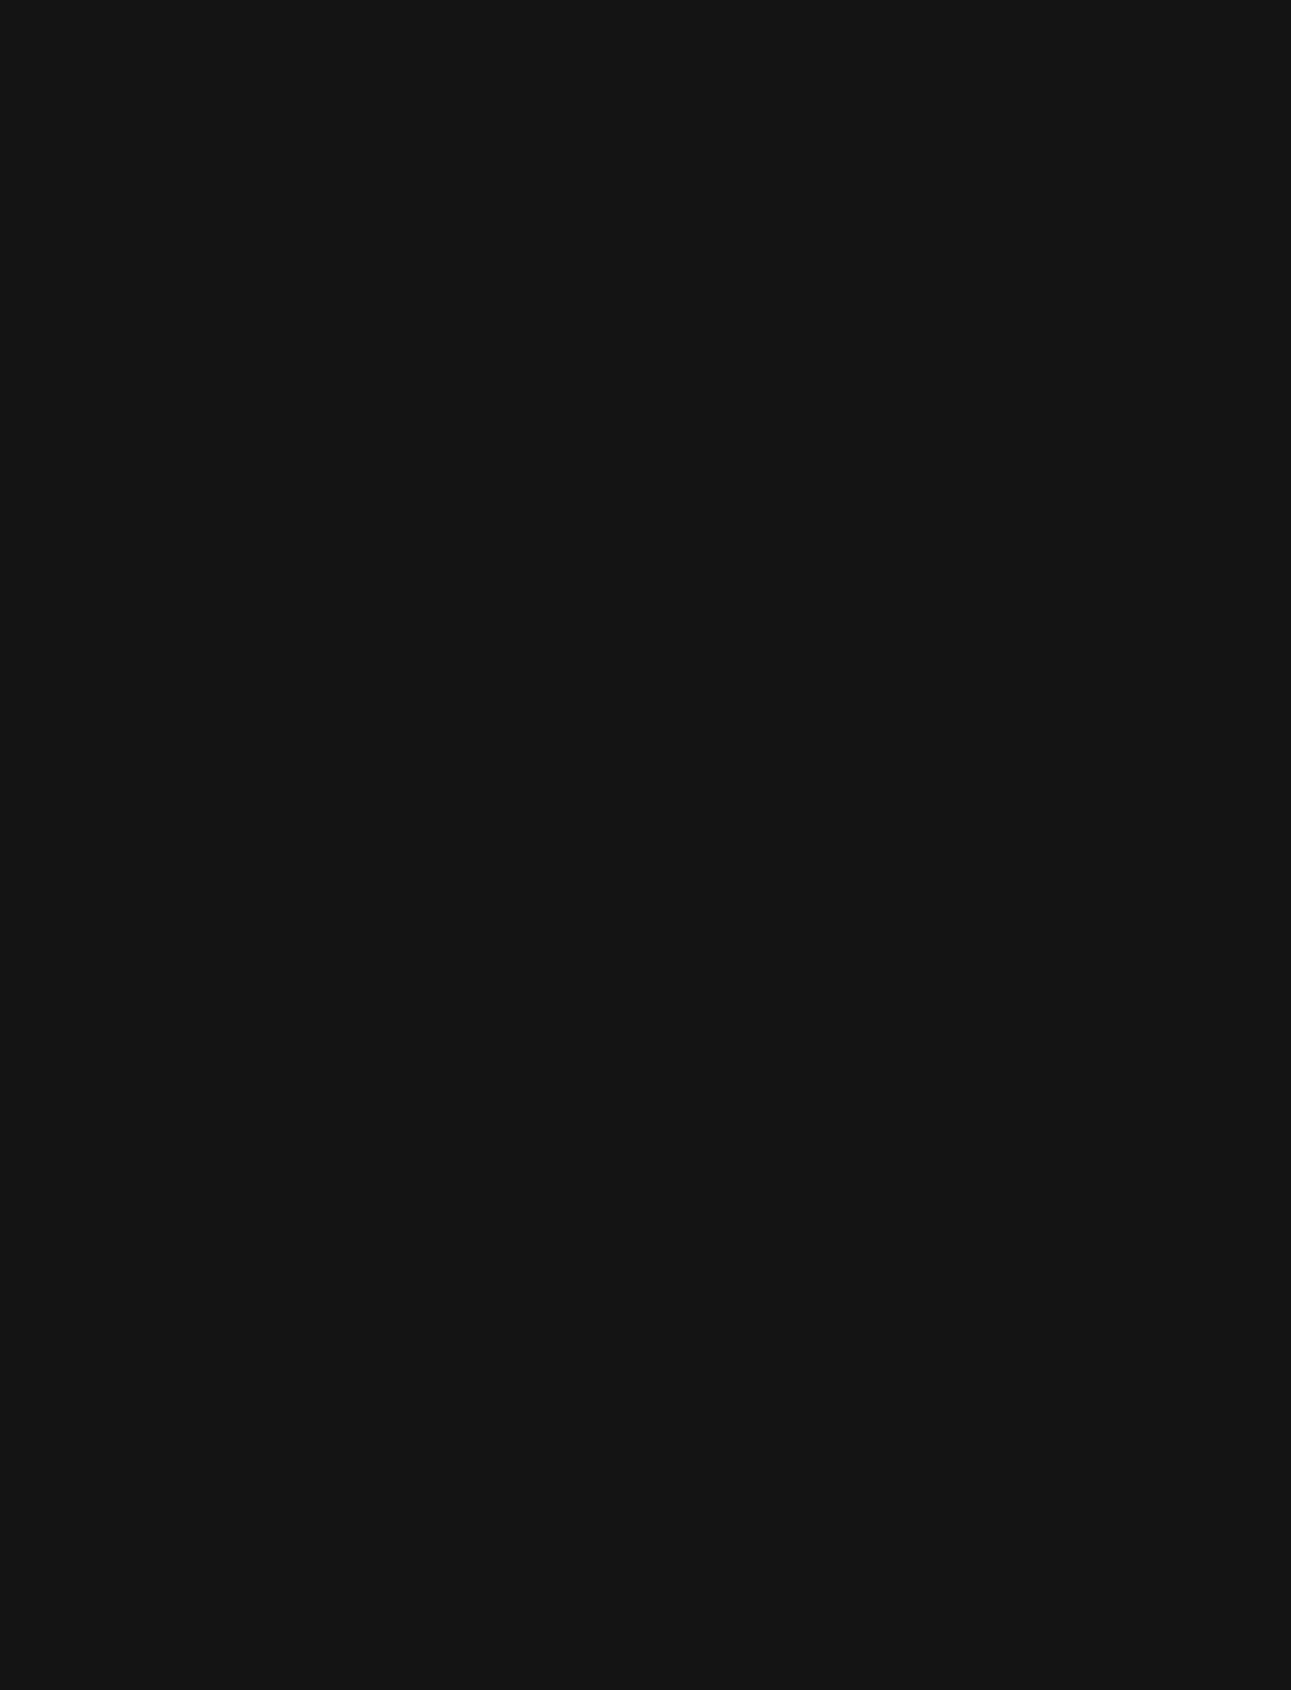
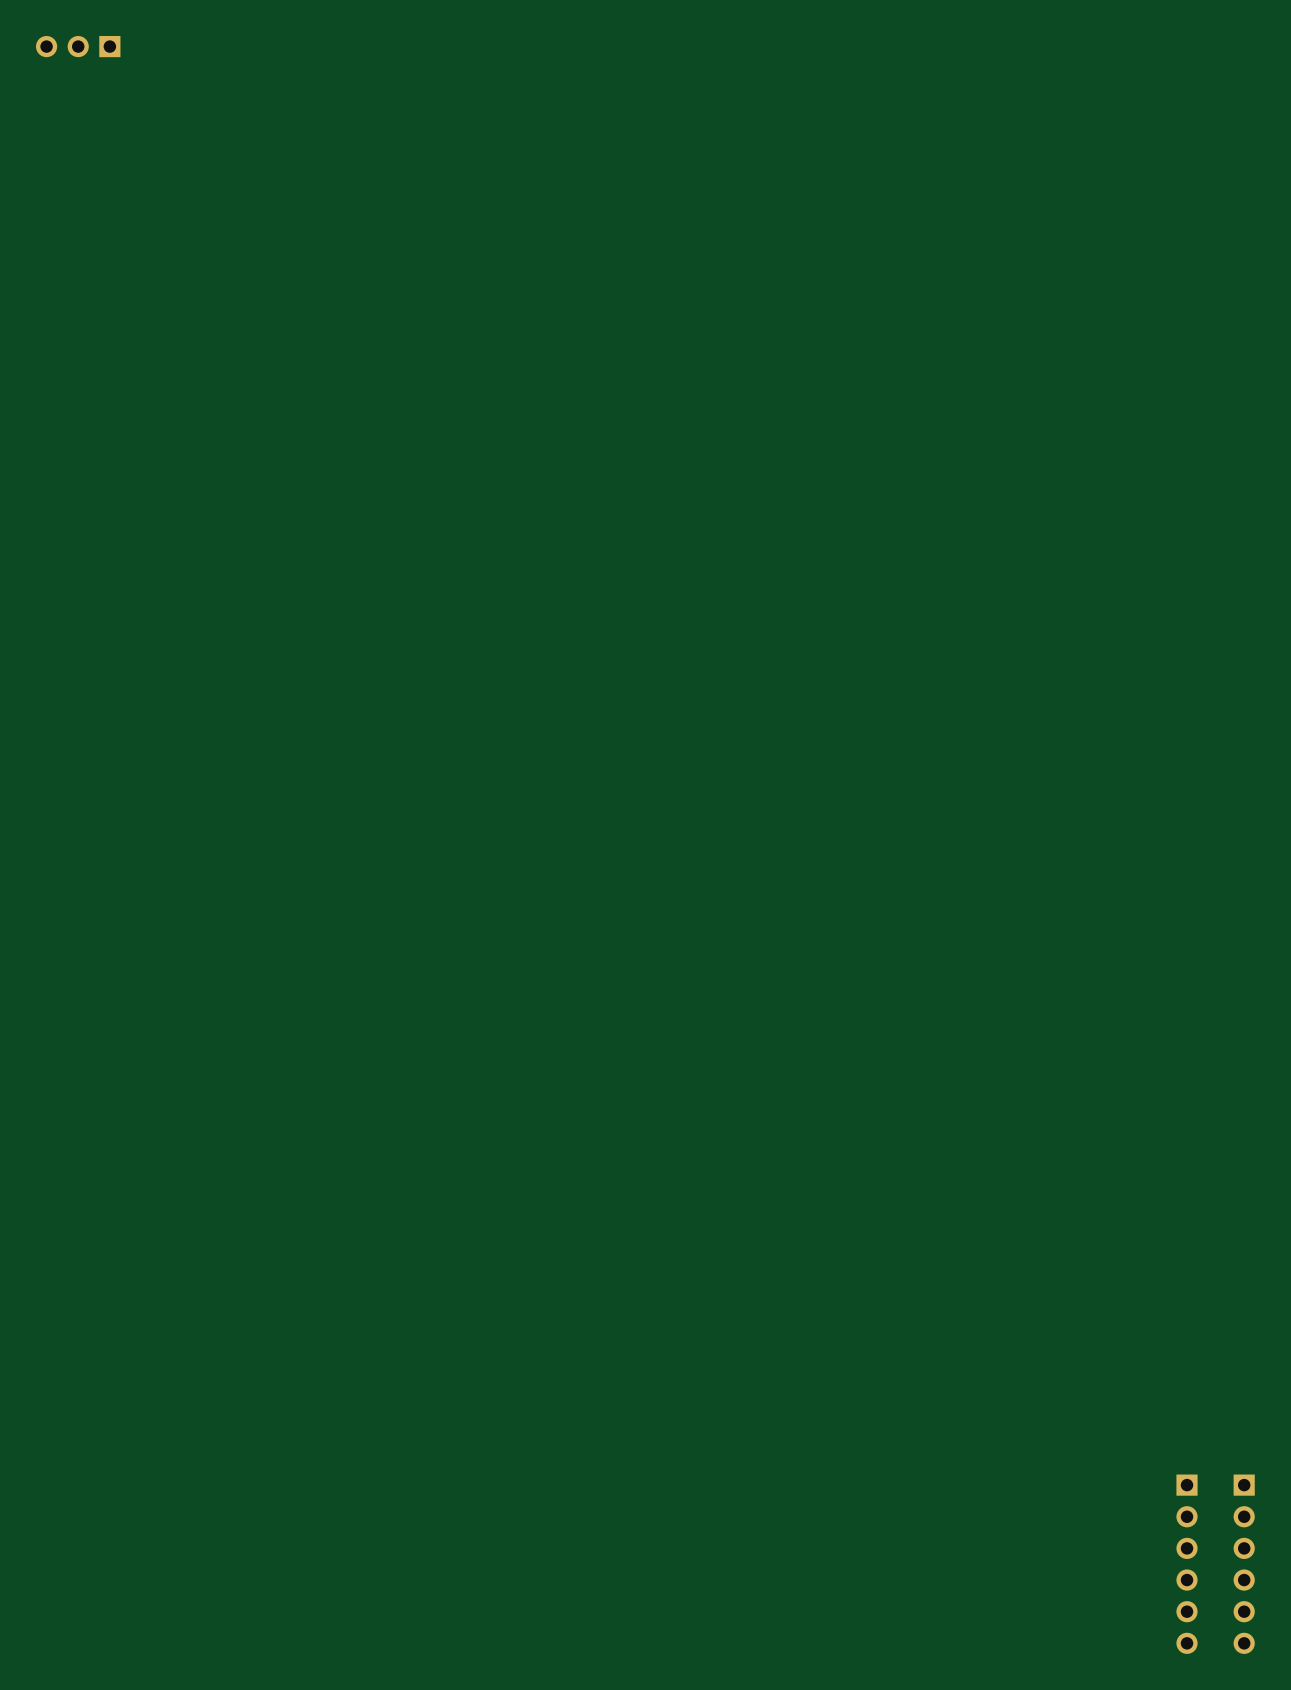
part: none -> (78, 46)
part: none -> (1187, 1564)
part: none -> (1244, 1564)

